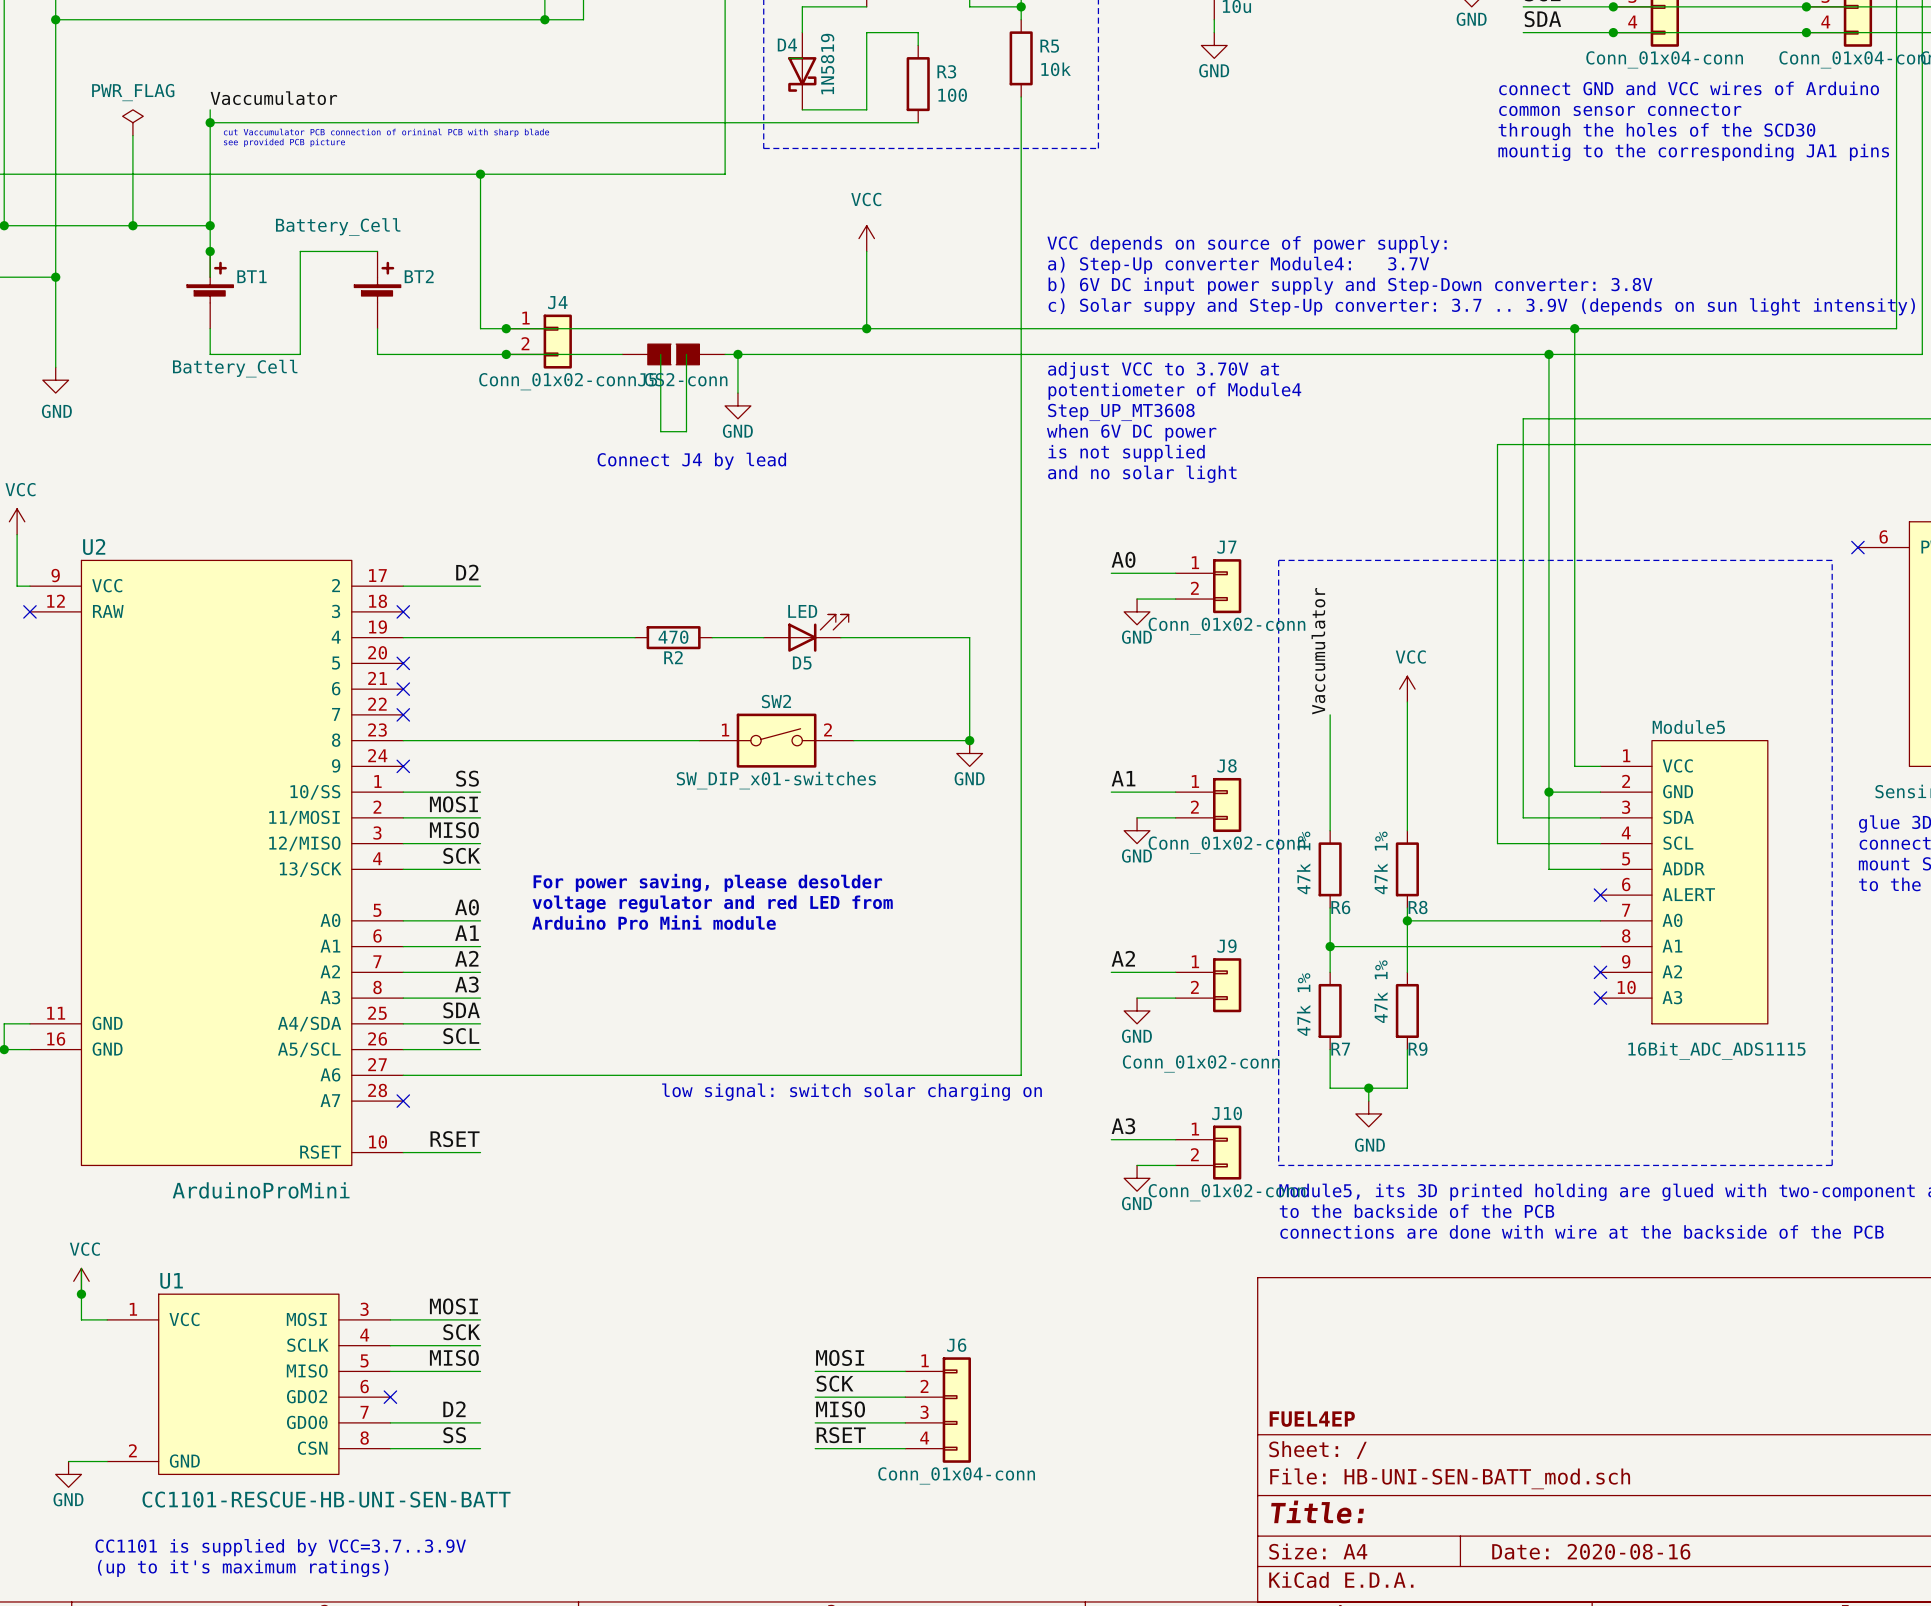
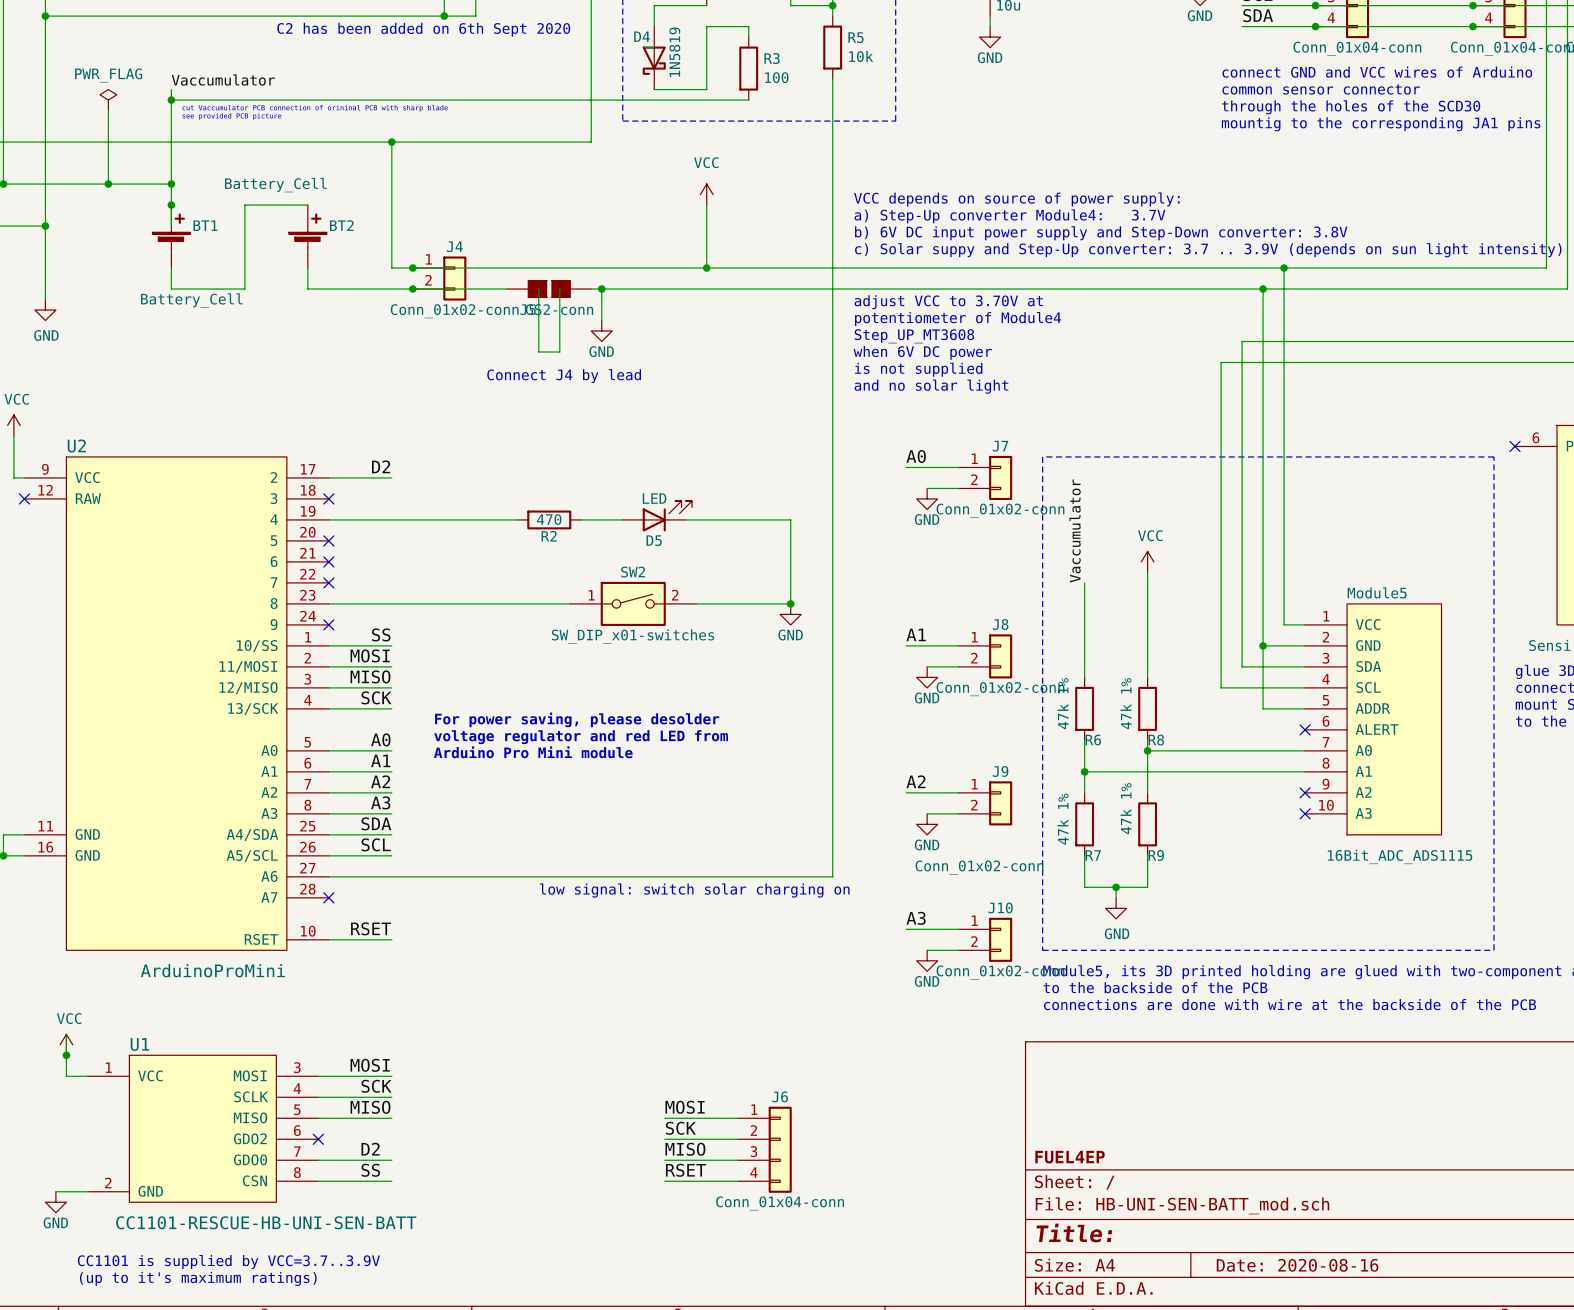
text: none -> C2 has been added on 6th Sept 2020 (423, 29)

